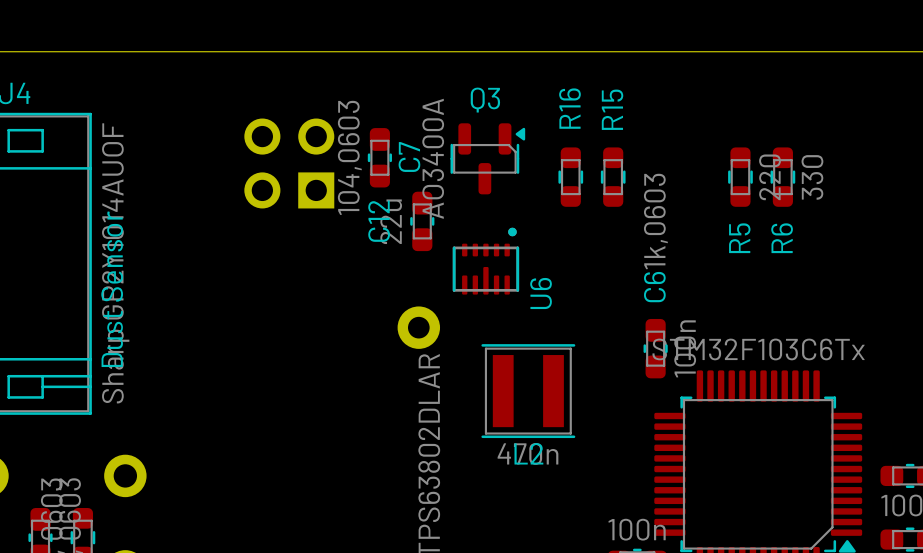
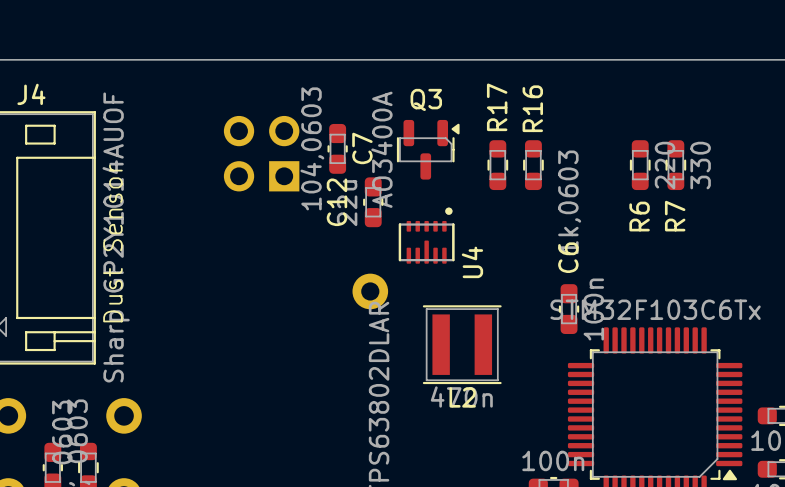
R16 name: R16 (569, 108) -> R17 (497, 107)
R15 name: R15 (612, 109) -> R16 (532, 108)
R5 name: R5 (739, 238) -> R6 (639, 216)
R6 name: R6 (782, 238) -> R7 (675, 216)
U6 name: U6 (541, 293) -> U4 (472, 262)

